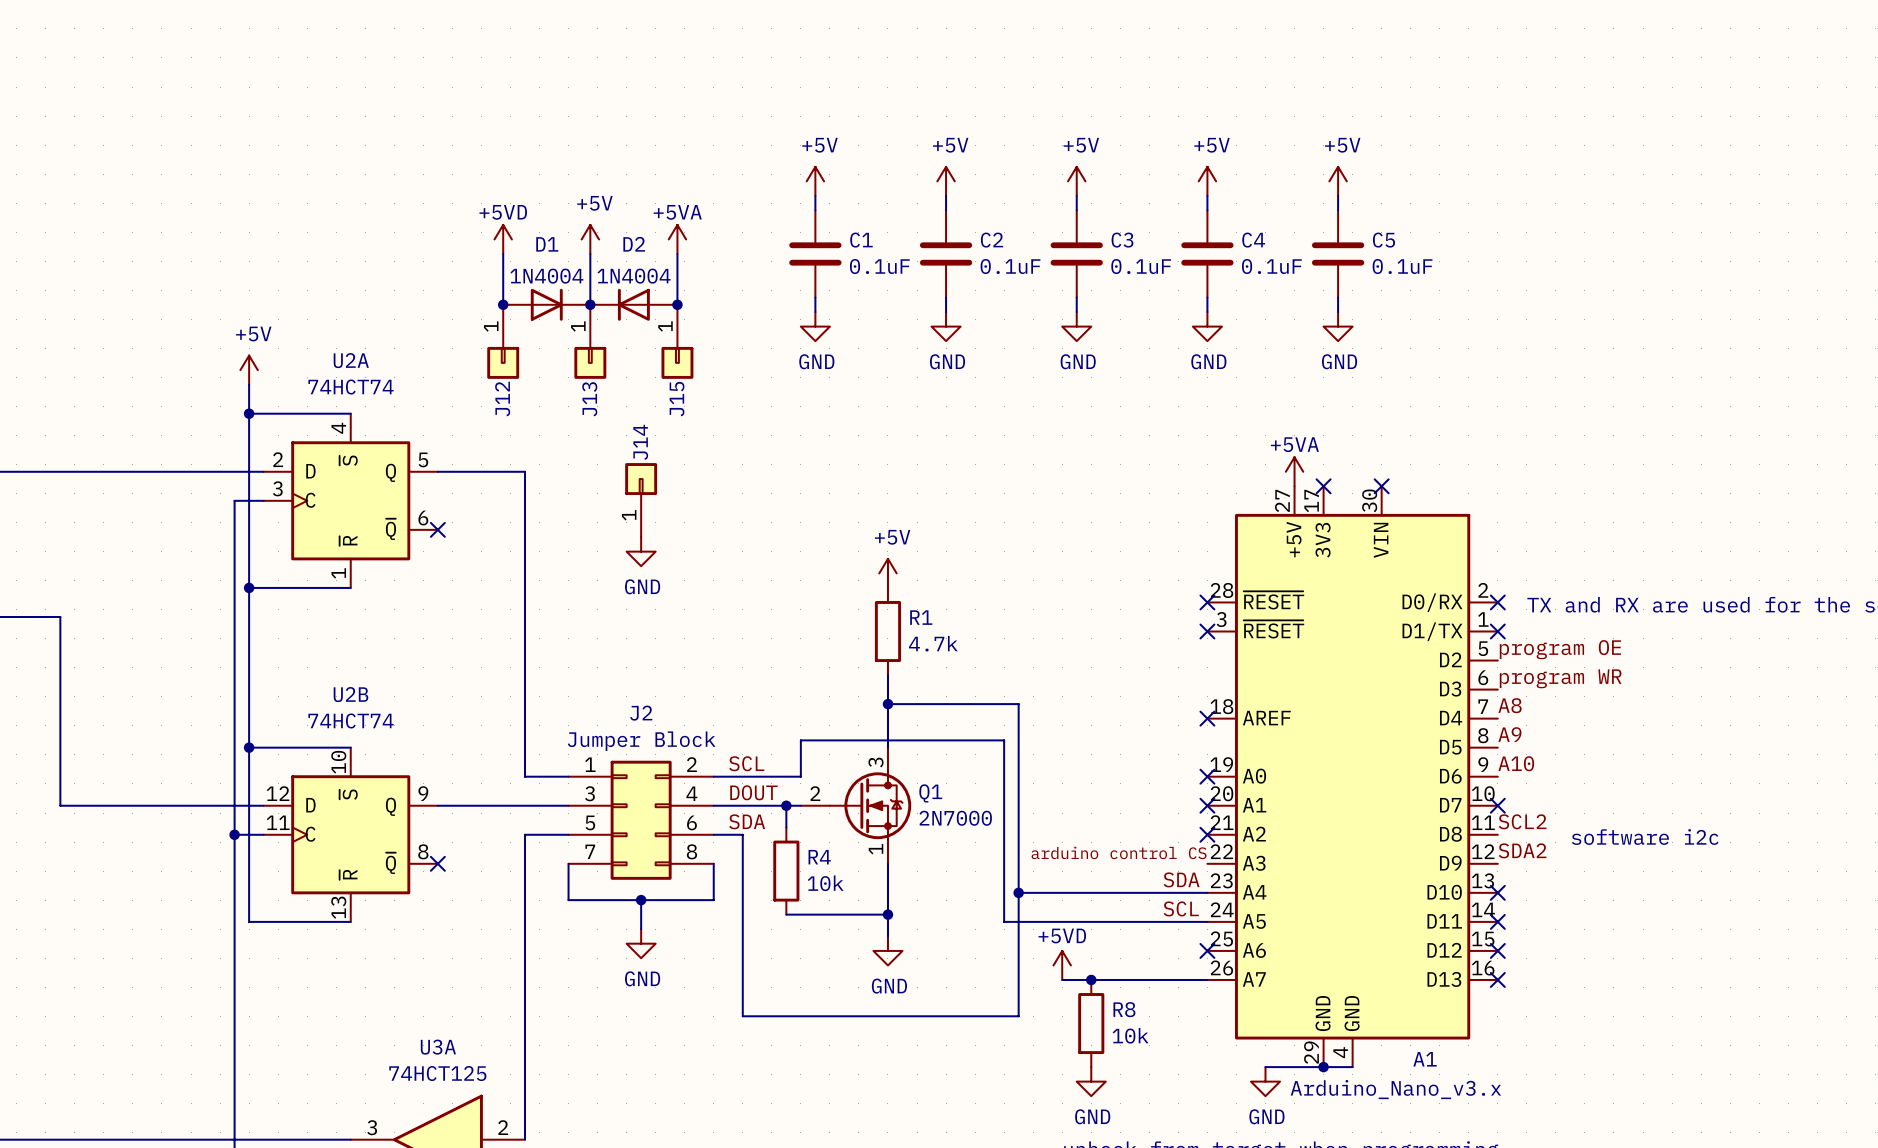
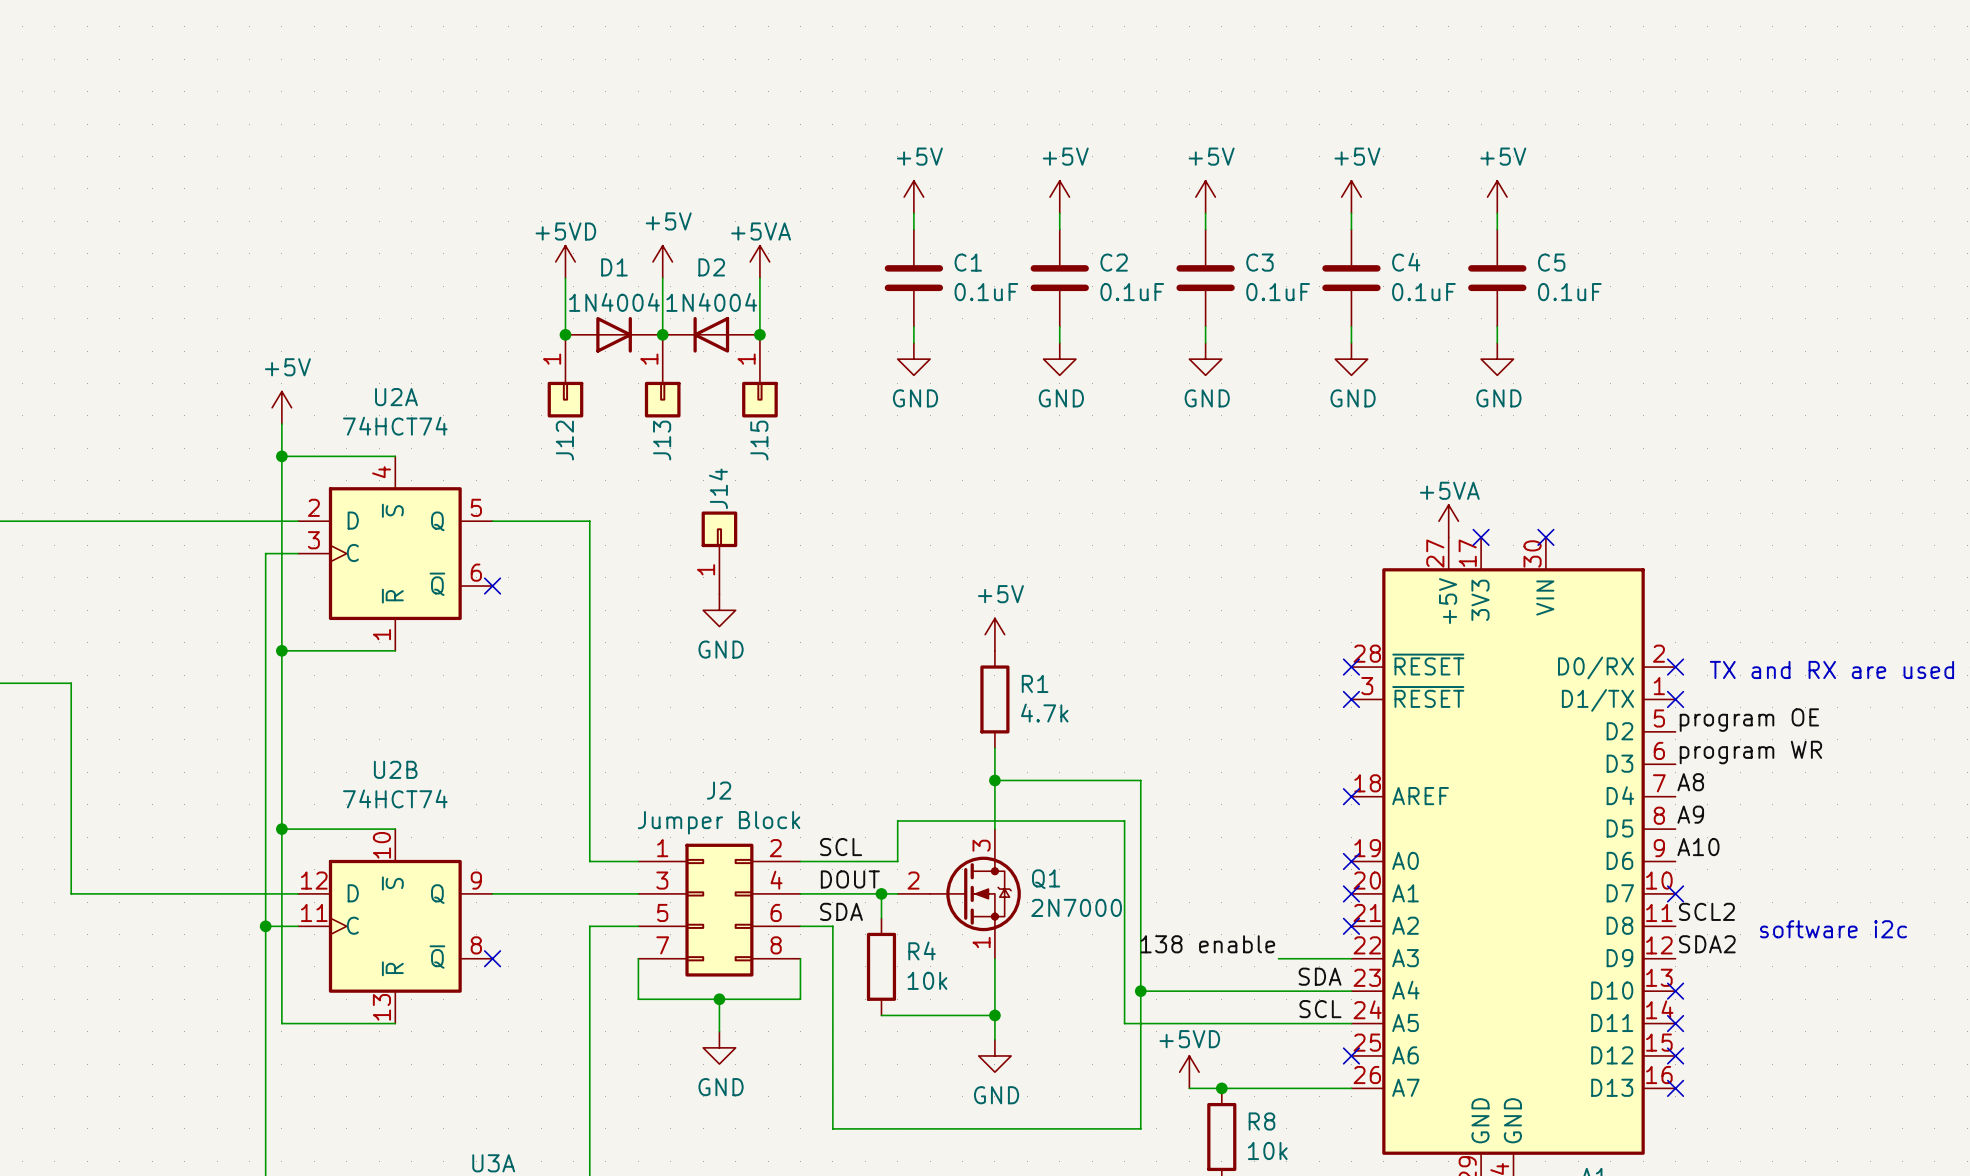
label: none -> 138 enable (1207, 944)
label: arduino control CS (1119, 852) -> none
wire: none -> (1278, 958) (1351, 958)

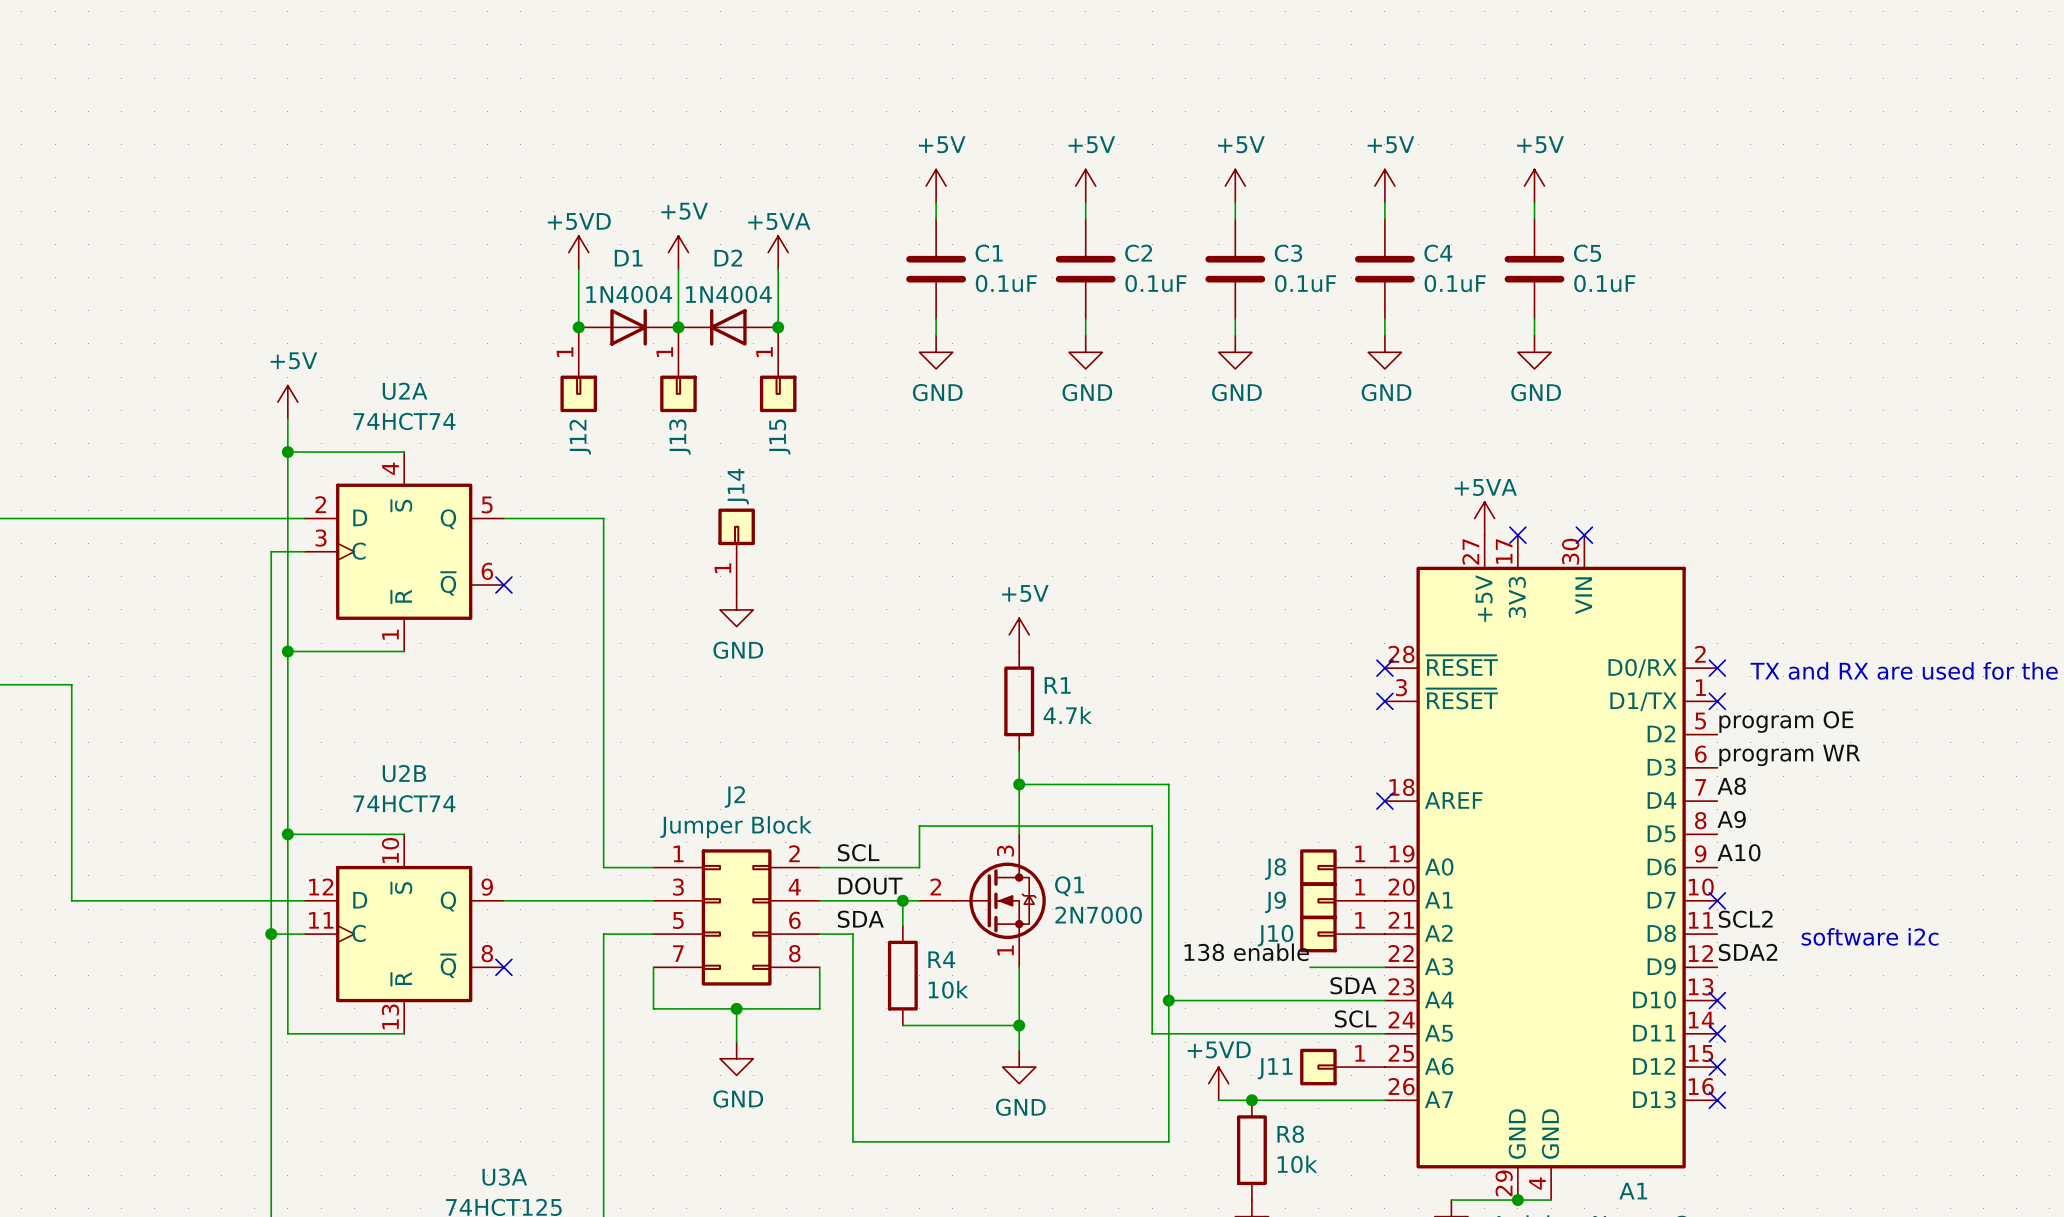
J8: none -> (1342, 867)
no-connect mark: (1351, 861) -> none
J9: none -> (1342, 900)
no-connect mark: (1351, 893) -> none
J10: none -> (1342, 934)
no-connect mark: (1351, 926) -> none
J11: none -> (1342, 1067)
no-connect mark: (1351, 1055) -> none

